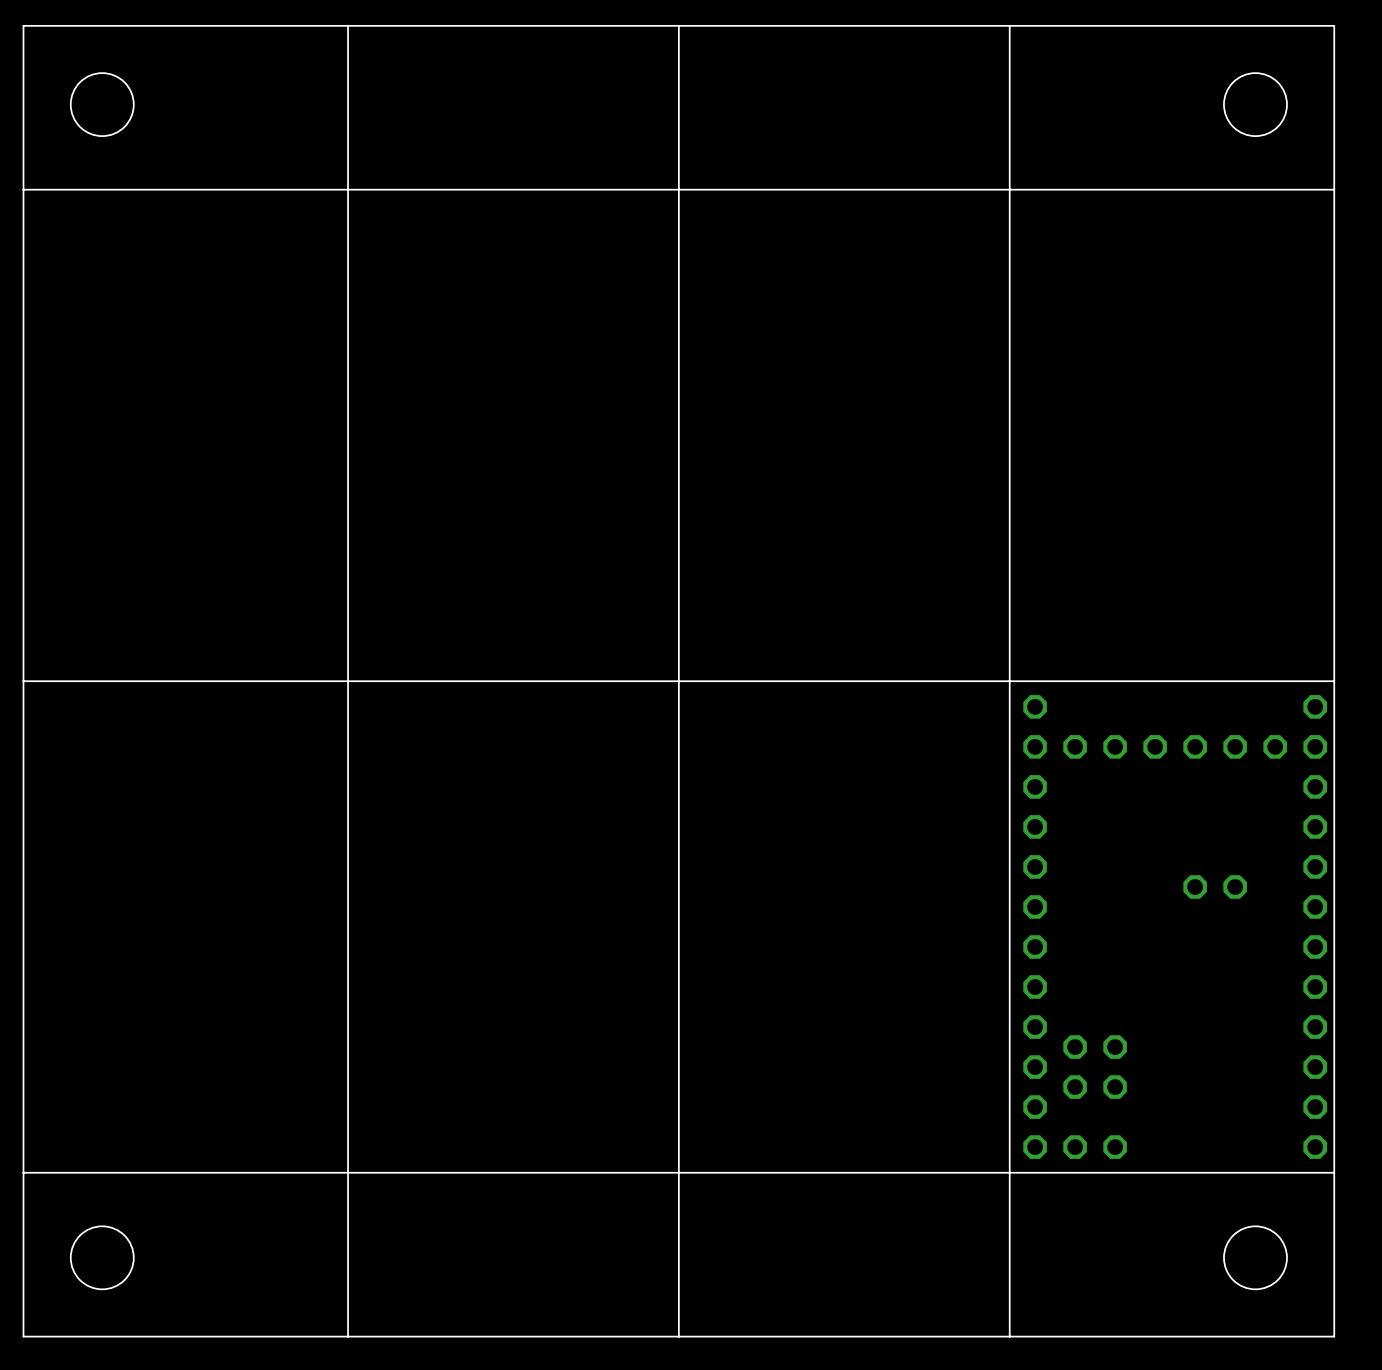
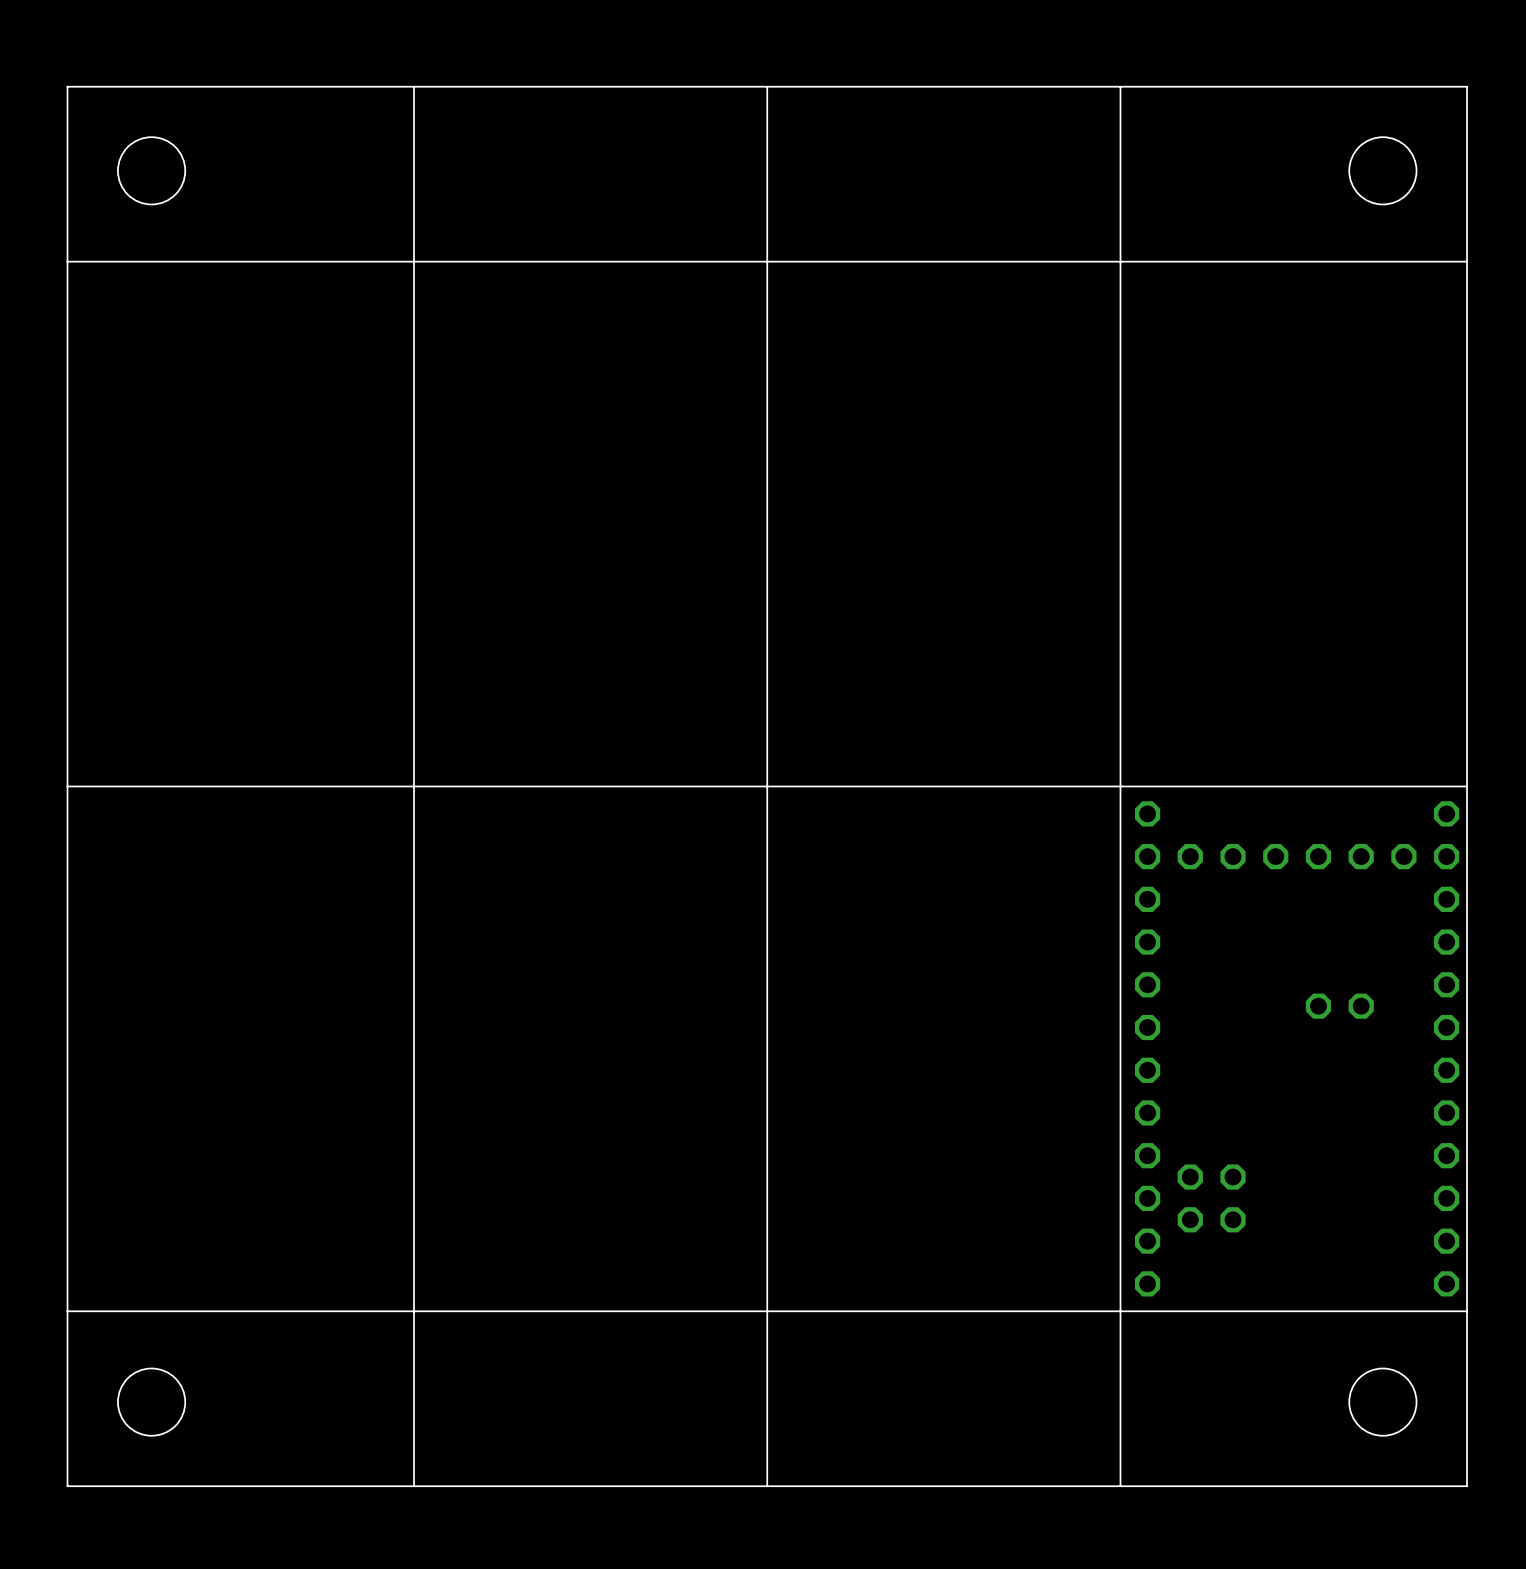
part: (1095, 1147) -> none

